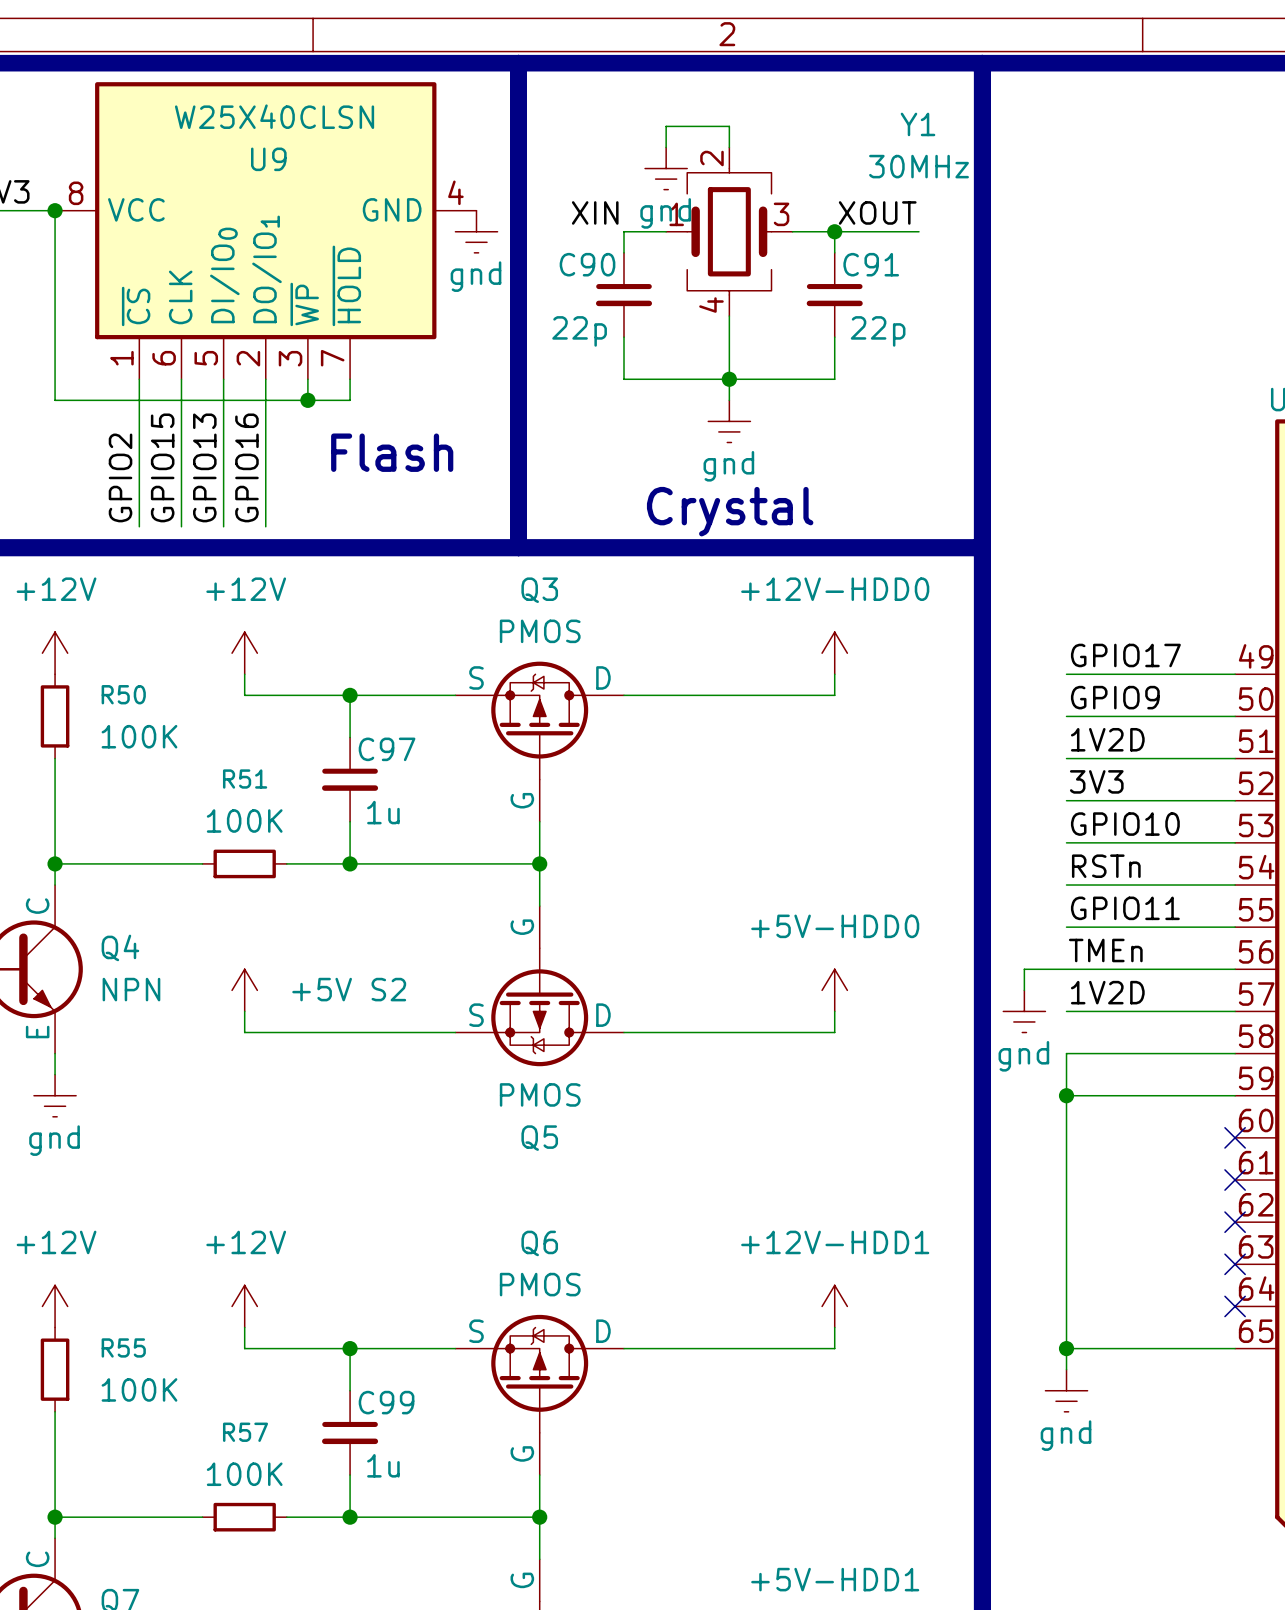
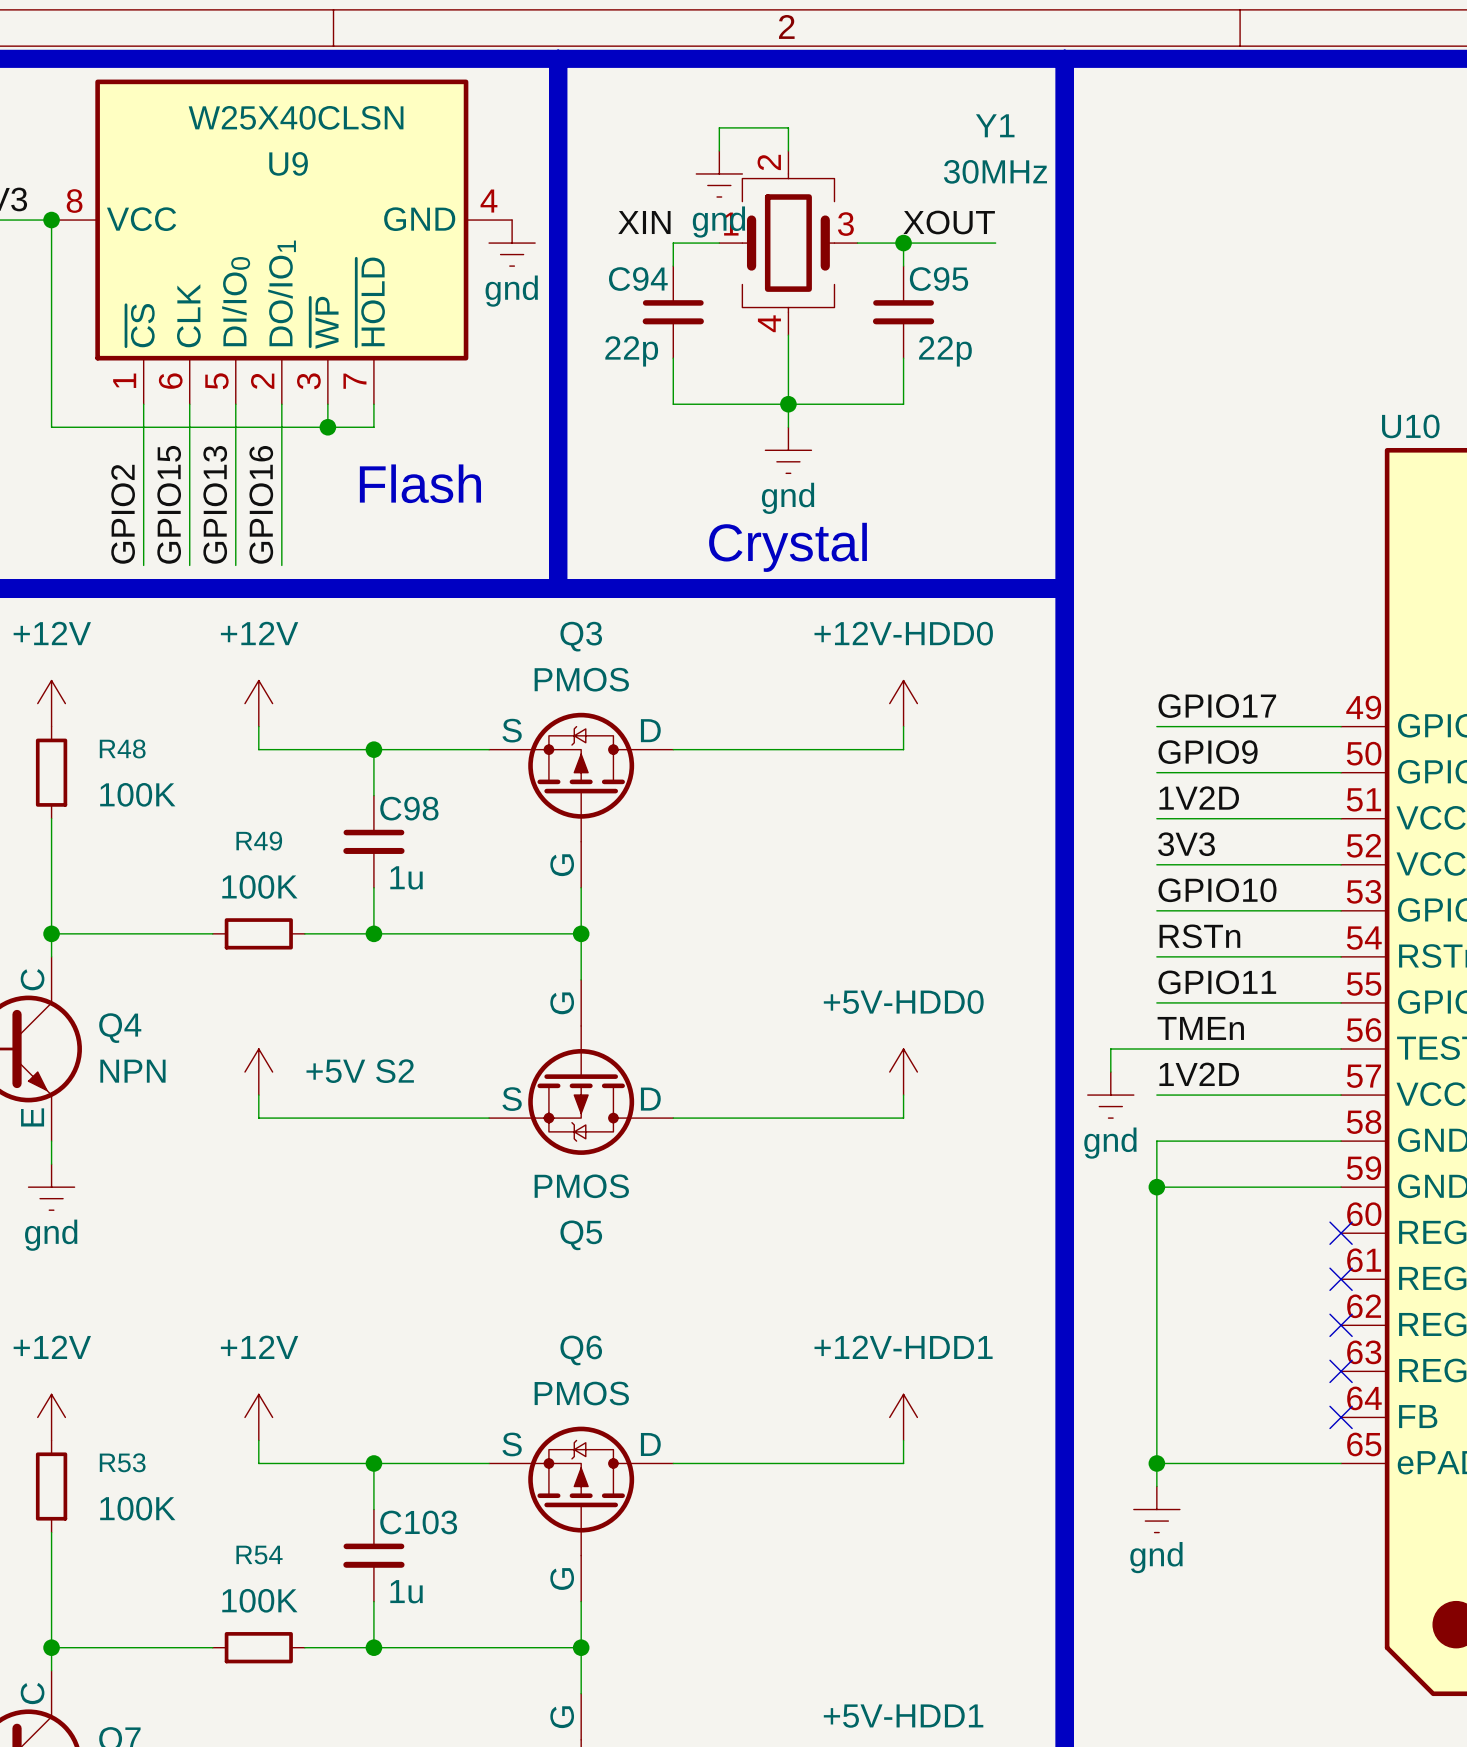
C90 name: C90 (587, 264) -> C94 (638, 279)
C91 name: C91 (871, 264) -> C95 (939, 279)
R50 name: R50 (123, 694) -> R48 (122, 748)
C97 name: C97 (387, 749) -> C98 (409, 808)
R51 name: R51 (245, 779) -> R49 (259, 841)
R55 name: R55 (123, 1347) -> R53 (122, 1462)
C99 name: C99 (386, 1402) -> C103 (418, 1522)
R57 name: R57 (245, 1432) -> R54 (259, 1555)

